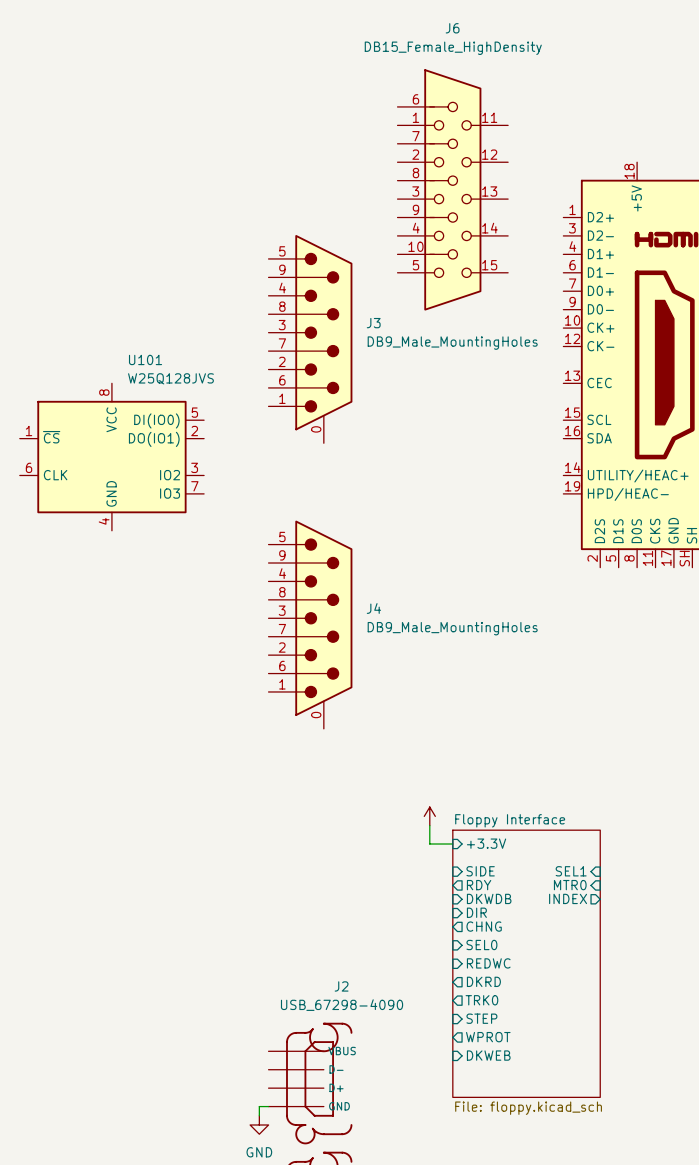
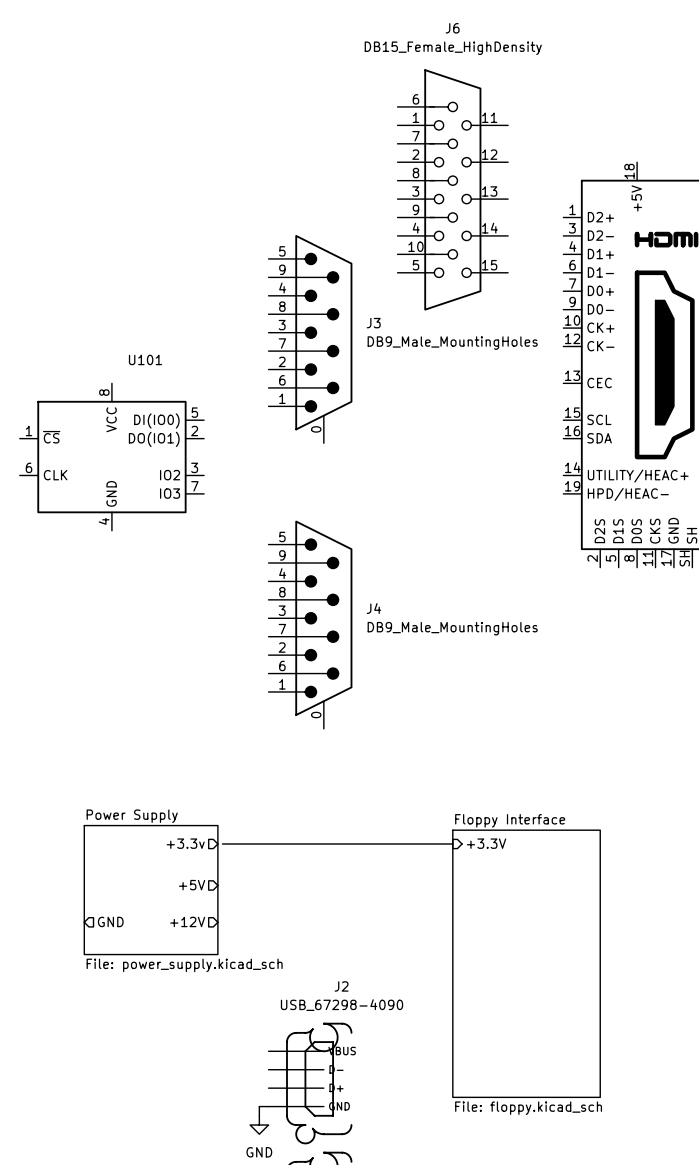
U101 value: W25Q128JVS (170, 378) -> none
power symbol: (429, 816) -> none
wire: (429, 825) (429, 844) -> (222, 844) (429, 844)
sheet pin: none -> +3.3v (185, 843)
sheet pin: SIDE (480, 871) -> none
sheet pin: SEL1 (571, 871) -> none
sheet pin: none -> +5V (192, 885)
sheet pin: RDY (479, 885) -> none
sheet pin: MTR0 (570, 885) -> none
sheet Power Supply: none -> File: power_supply.kicad_sch (151, 890)
sheet pin: DKWDB (489, 898) -> none
sheet pin: INDEX (568, 898) -> none
sheet pin: DIR (476, 912) -> none
sheet pin: none -> GND (110, 921)
sheet pin: none -> +12V (187, 921)
sheet pin: CHNG (484, 926) -> none
sheet pin: SEL0 (481, 945) -> none
sheet pin: REDWC (488, 963) -> none
sheet pin: DKRD (483, 981) -> none
sheet pin: TRK0 (481, 1000) -> none
sheet pin: STEP (481, 1018) -> none
sheet pin: WPROT (488, 1037) -> none
sheet pin: DKWEB (488, 1055) -> none

